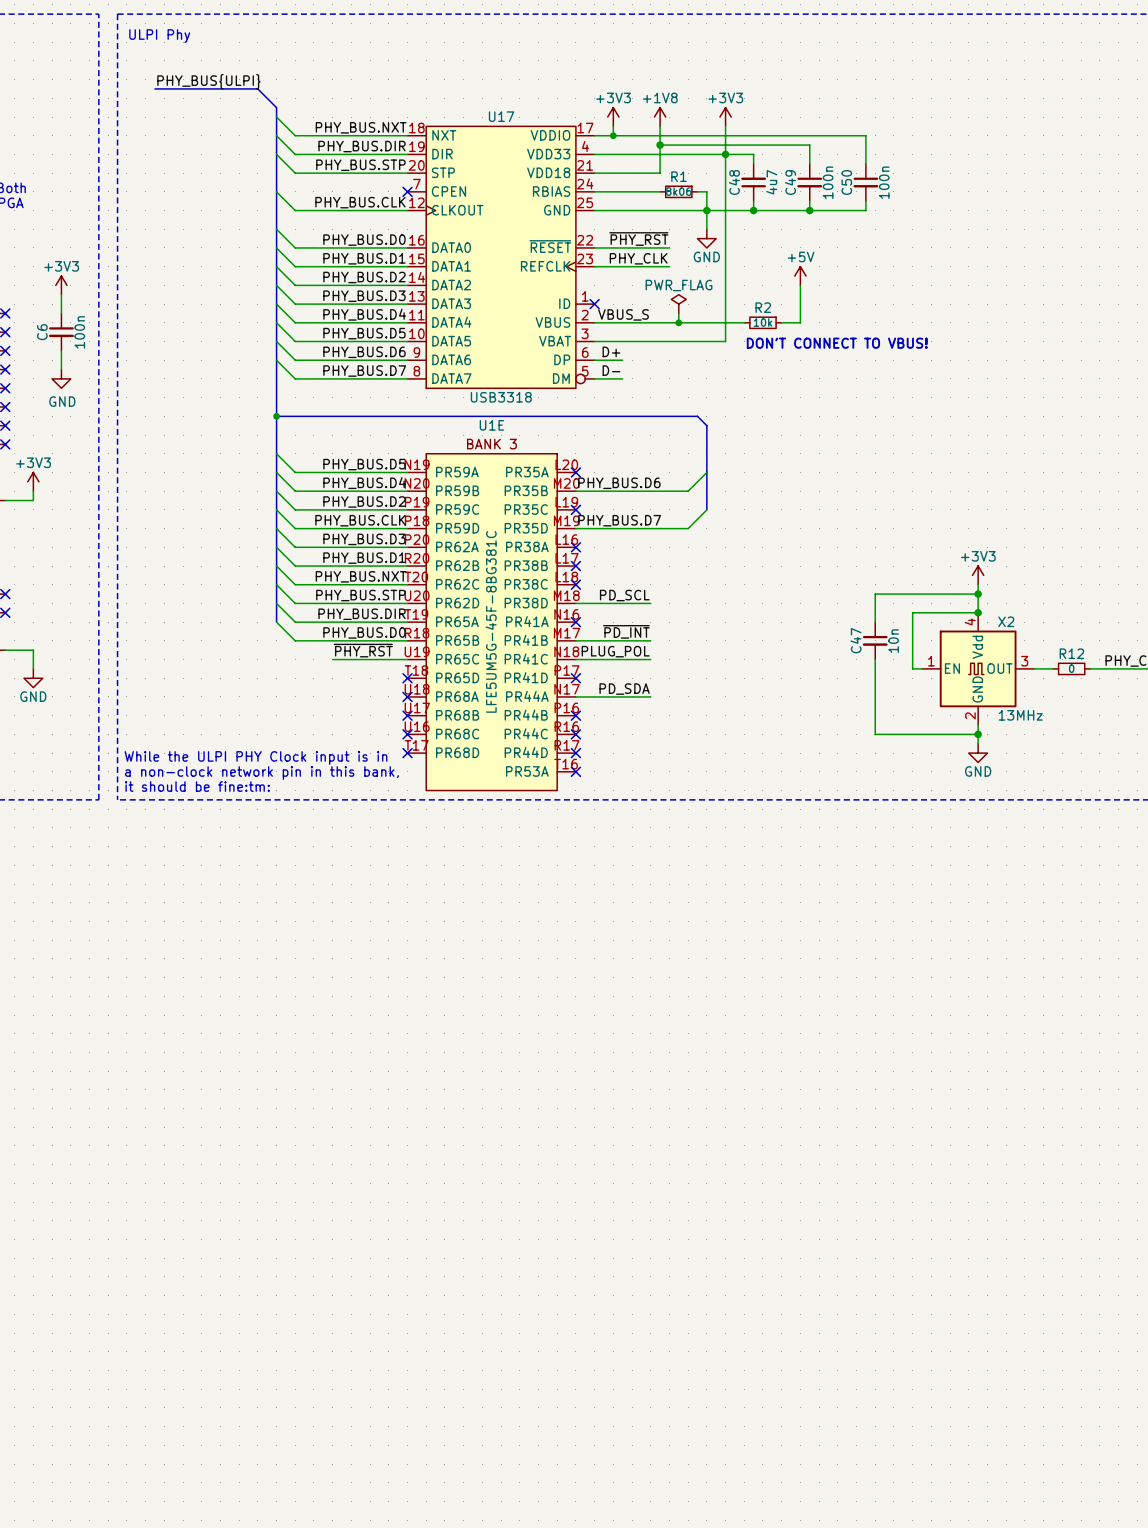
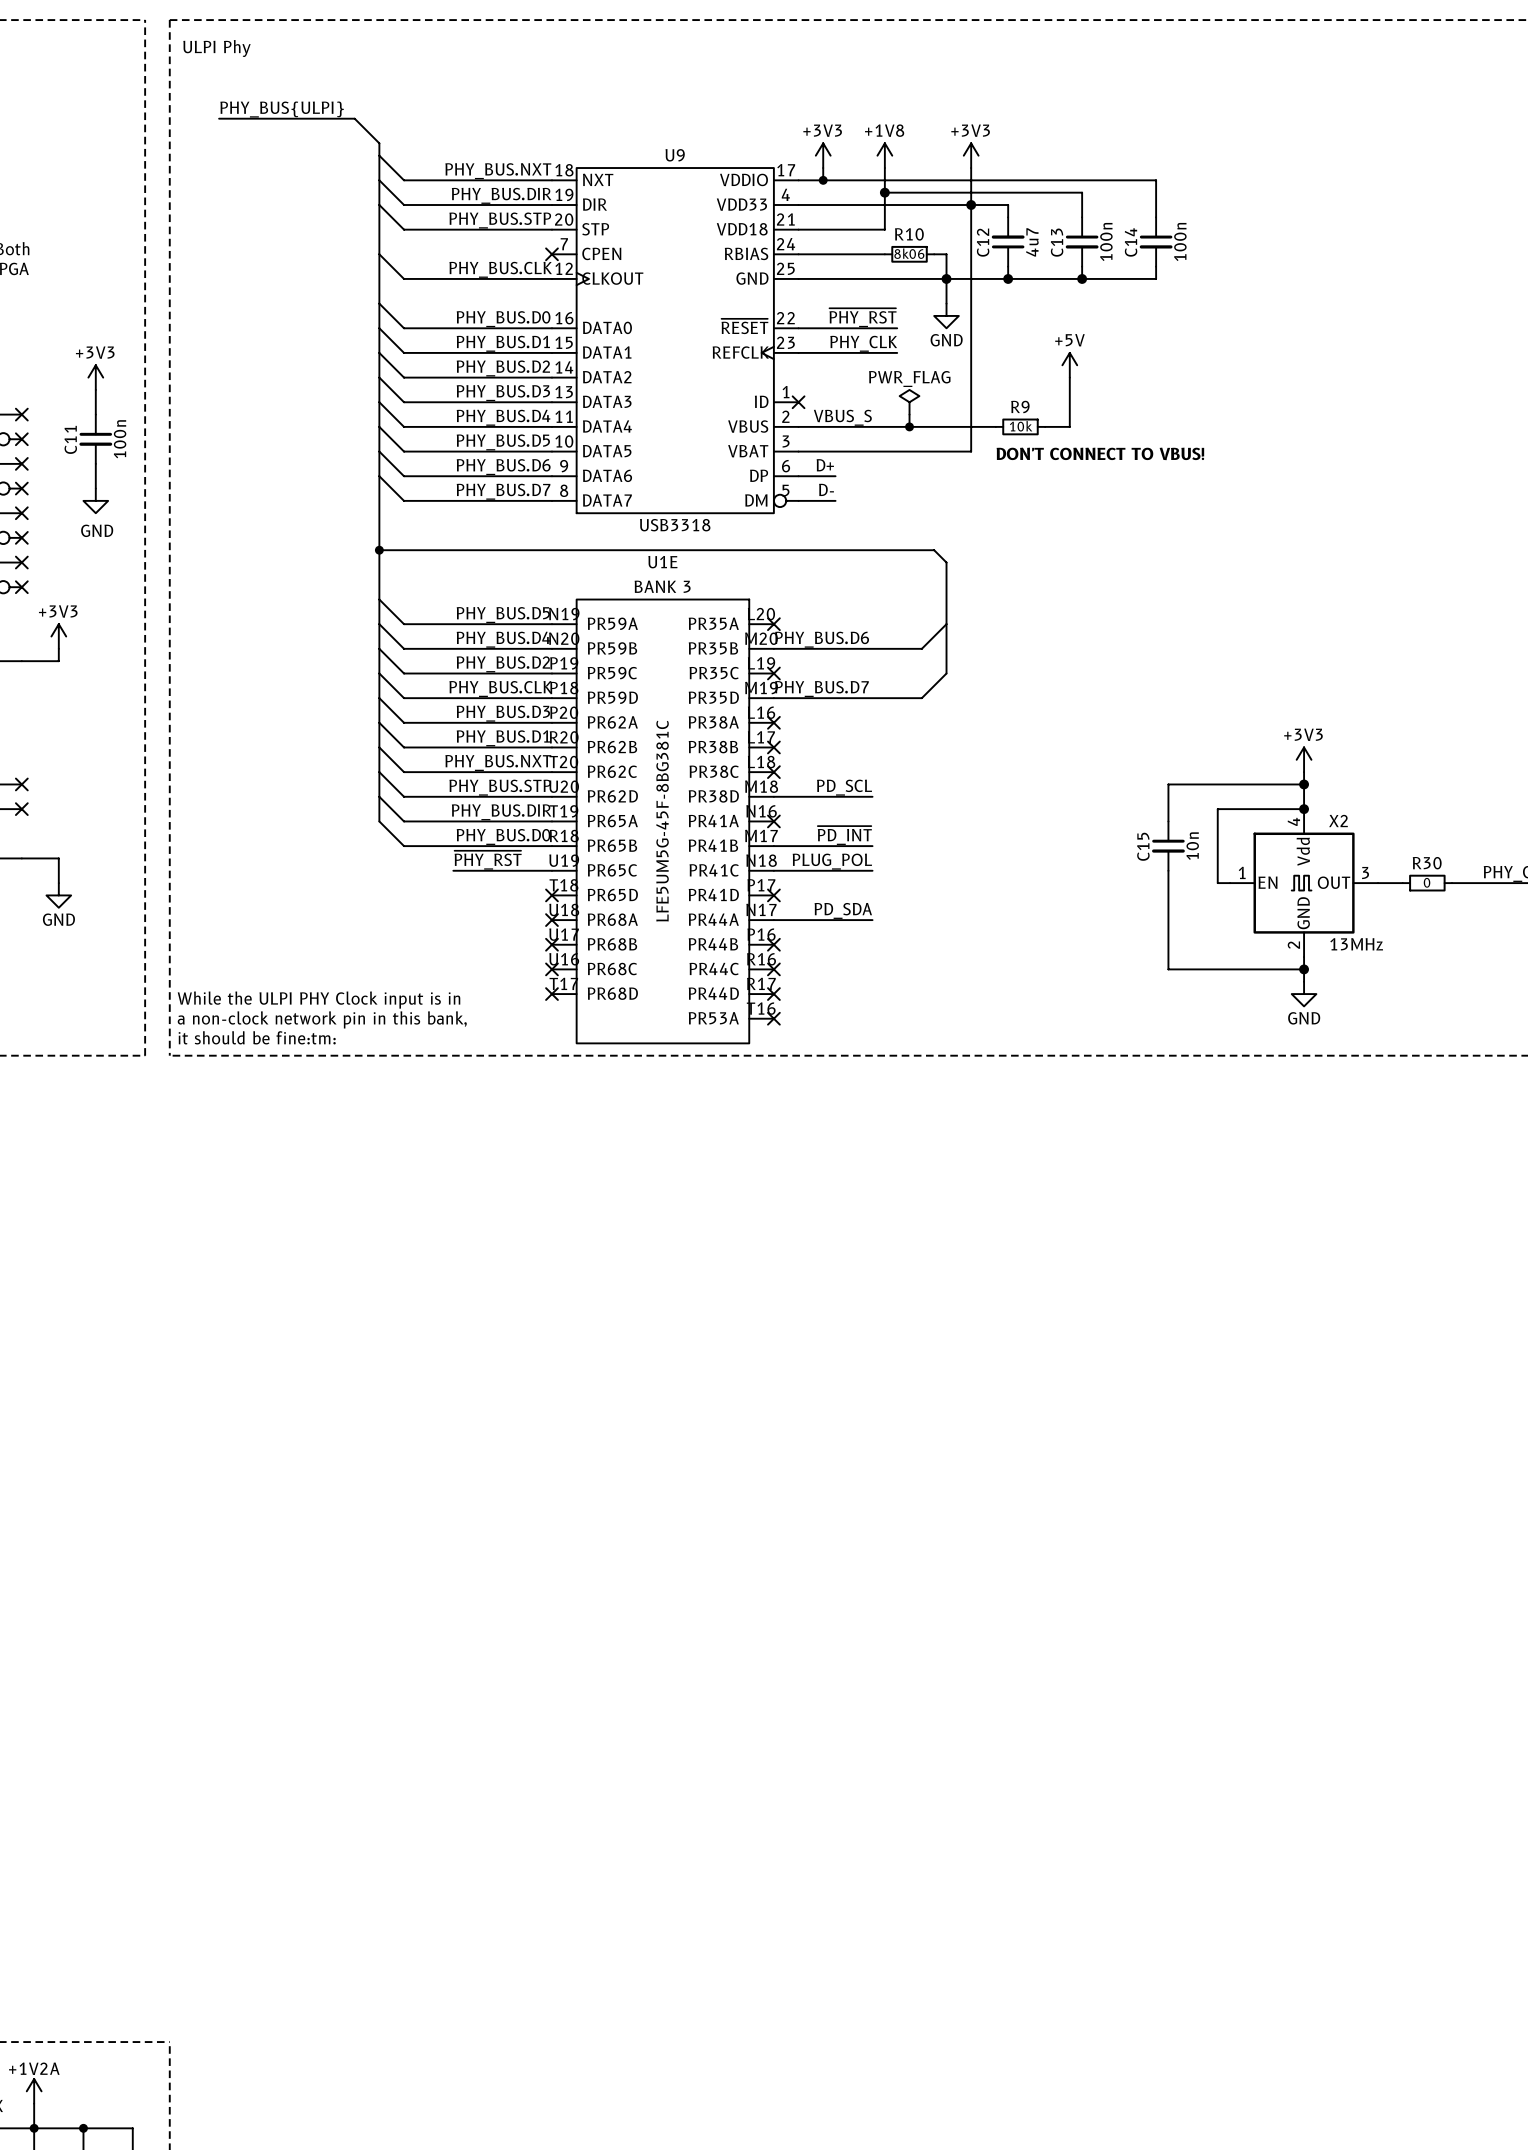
U17 name: U17 (501, 116) -> U9 (675, 155)
R1 name: R1 (679, 176) -> R10 (909, 234)
C48 name: C48 (734, 182) -> C12 (983, 242)
C49 name: C49 (790, 182) -> C13 (1057, 242)
C50 name: C50 (846, 182) -> C14 (1131, 242)
R2 name: R2 (763, 307) -> R9 (1020, 407)
C6 name: C6 (42, 332) -> C11 (70, 439)
C47 name: C47 (855, 640) -> C15 (1143, 846)
R12 name: R12 (1071, 653) -> R30 (1427, 863)

